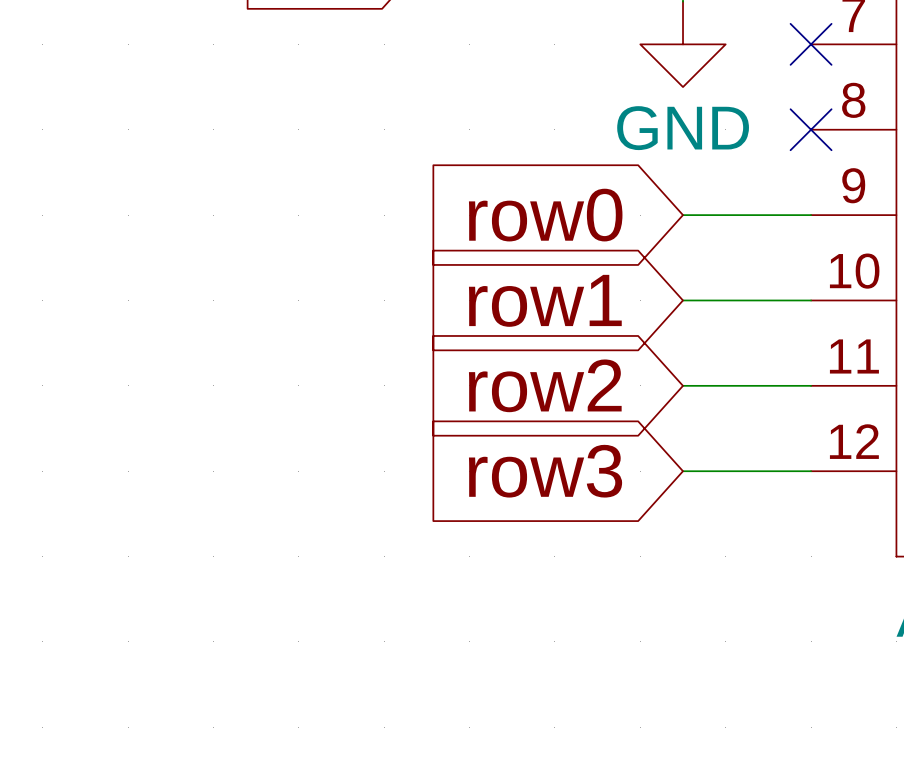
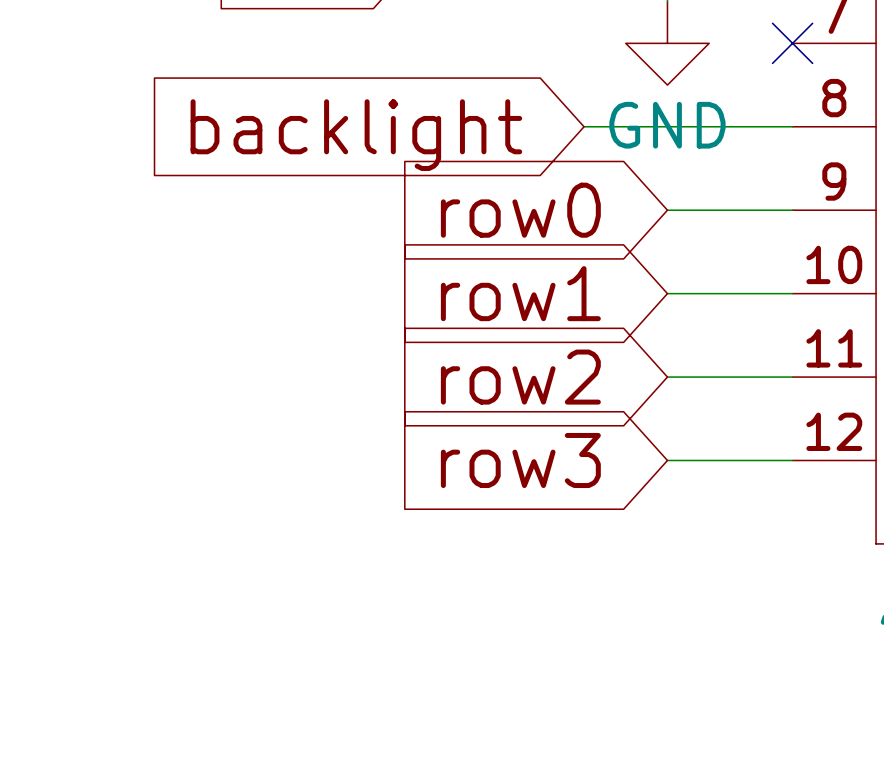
wire: none -> (584, 126) (792, 126)
no-connect mark: (811, 129) -> none
global label: none -> backlight (356, 135)

